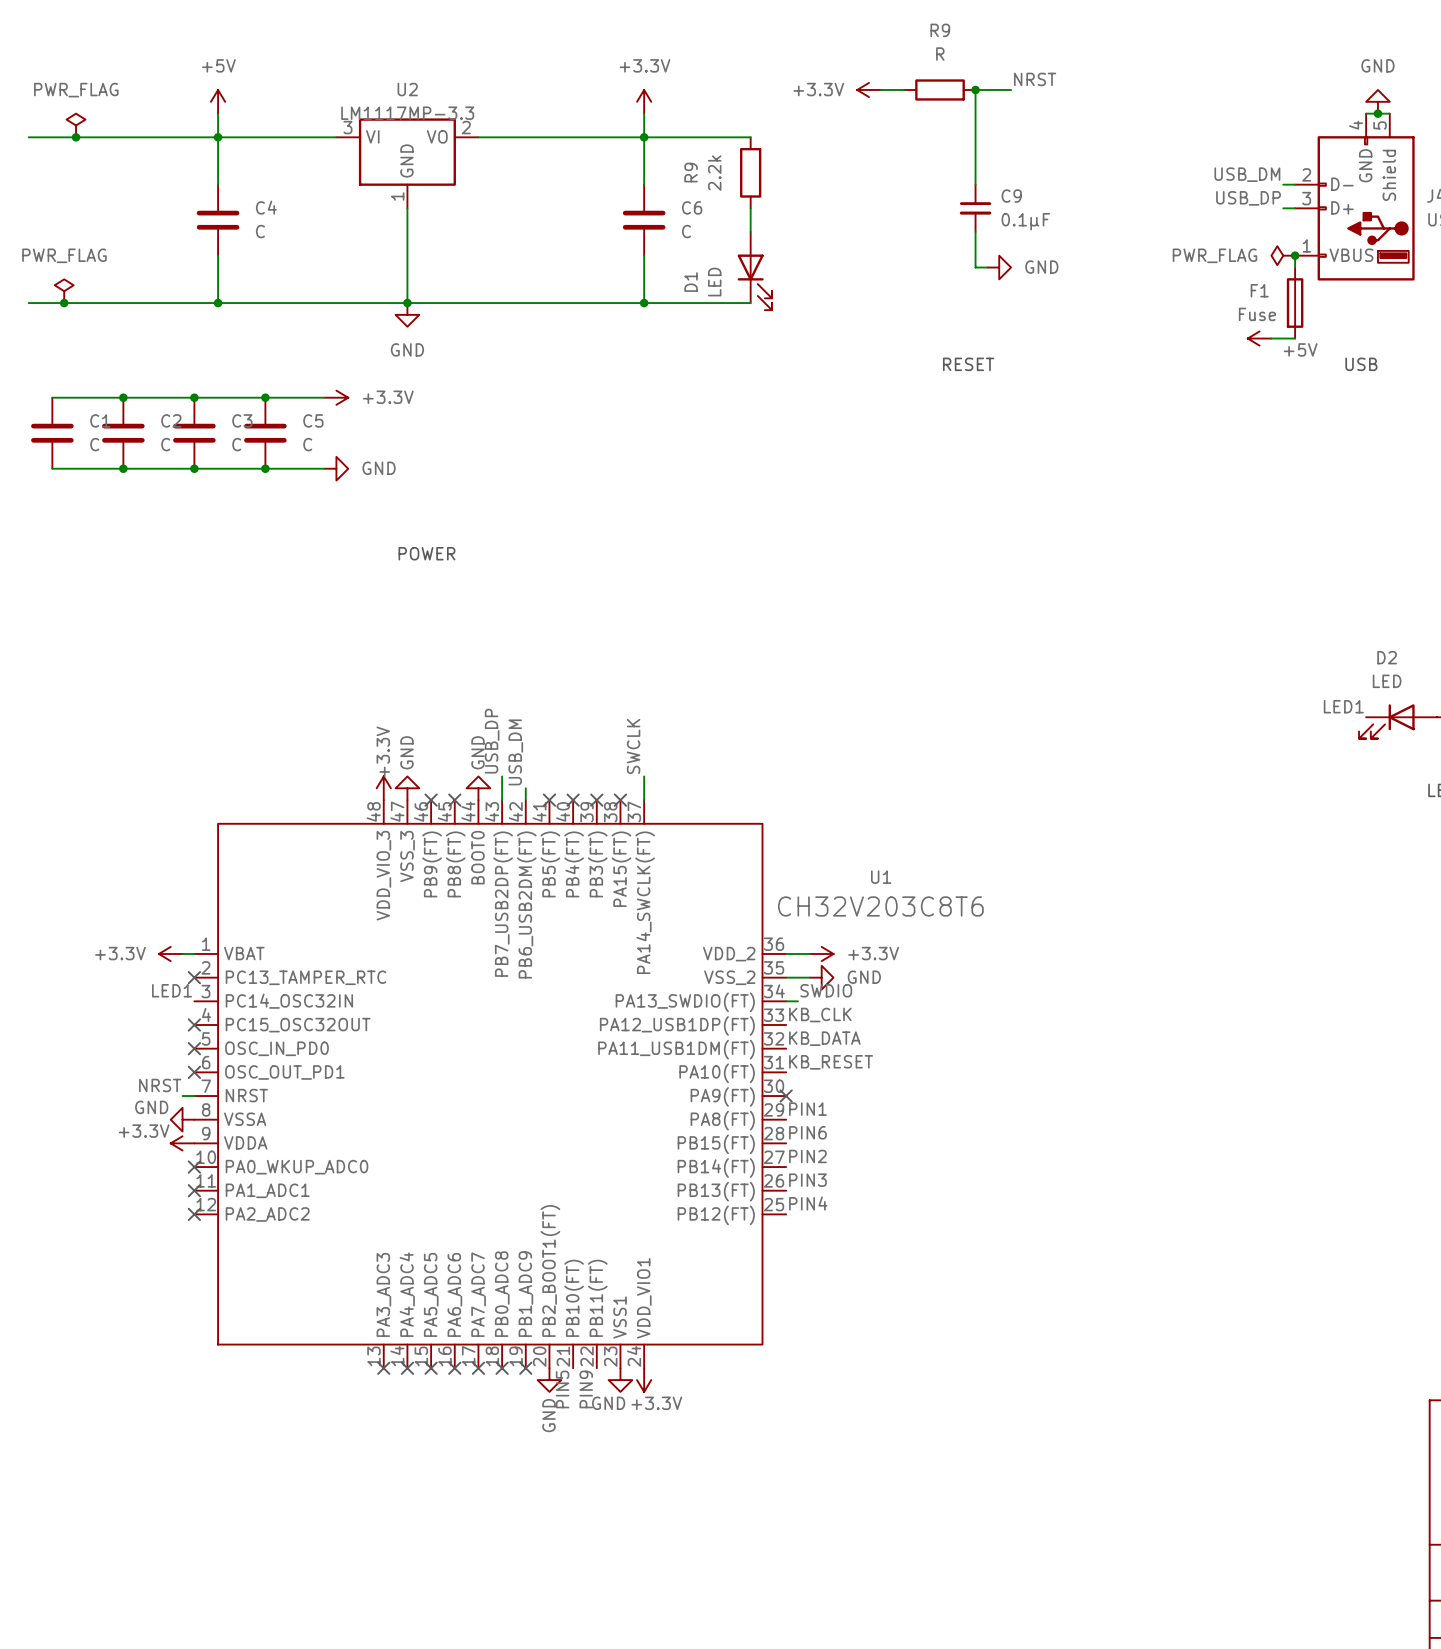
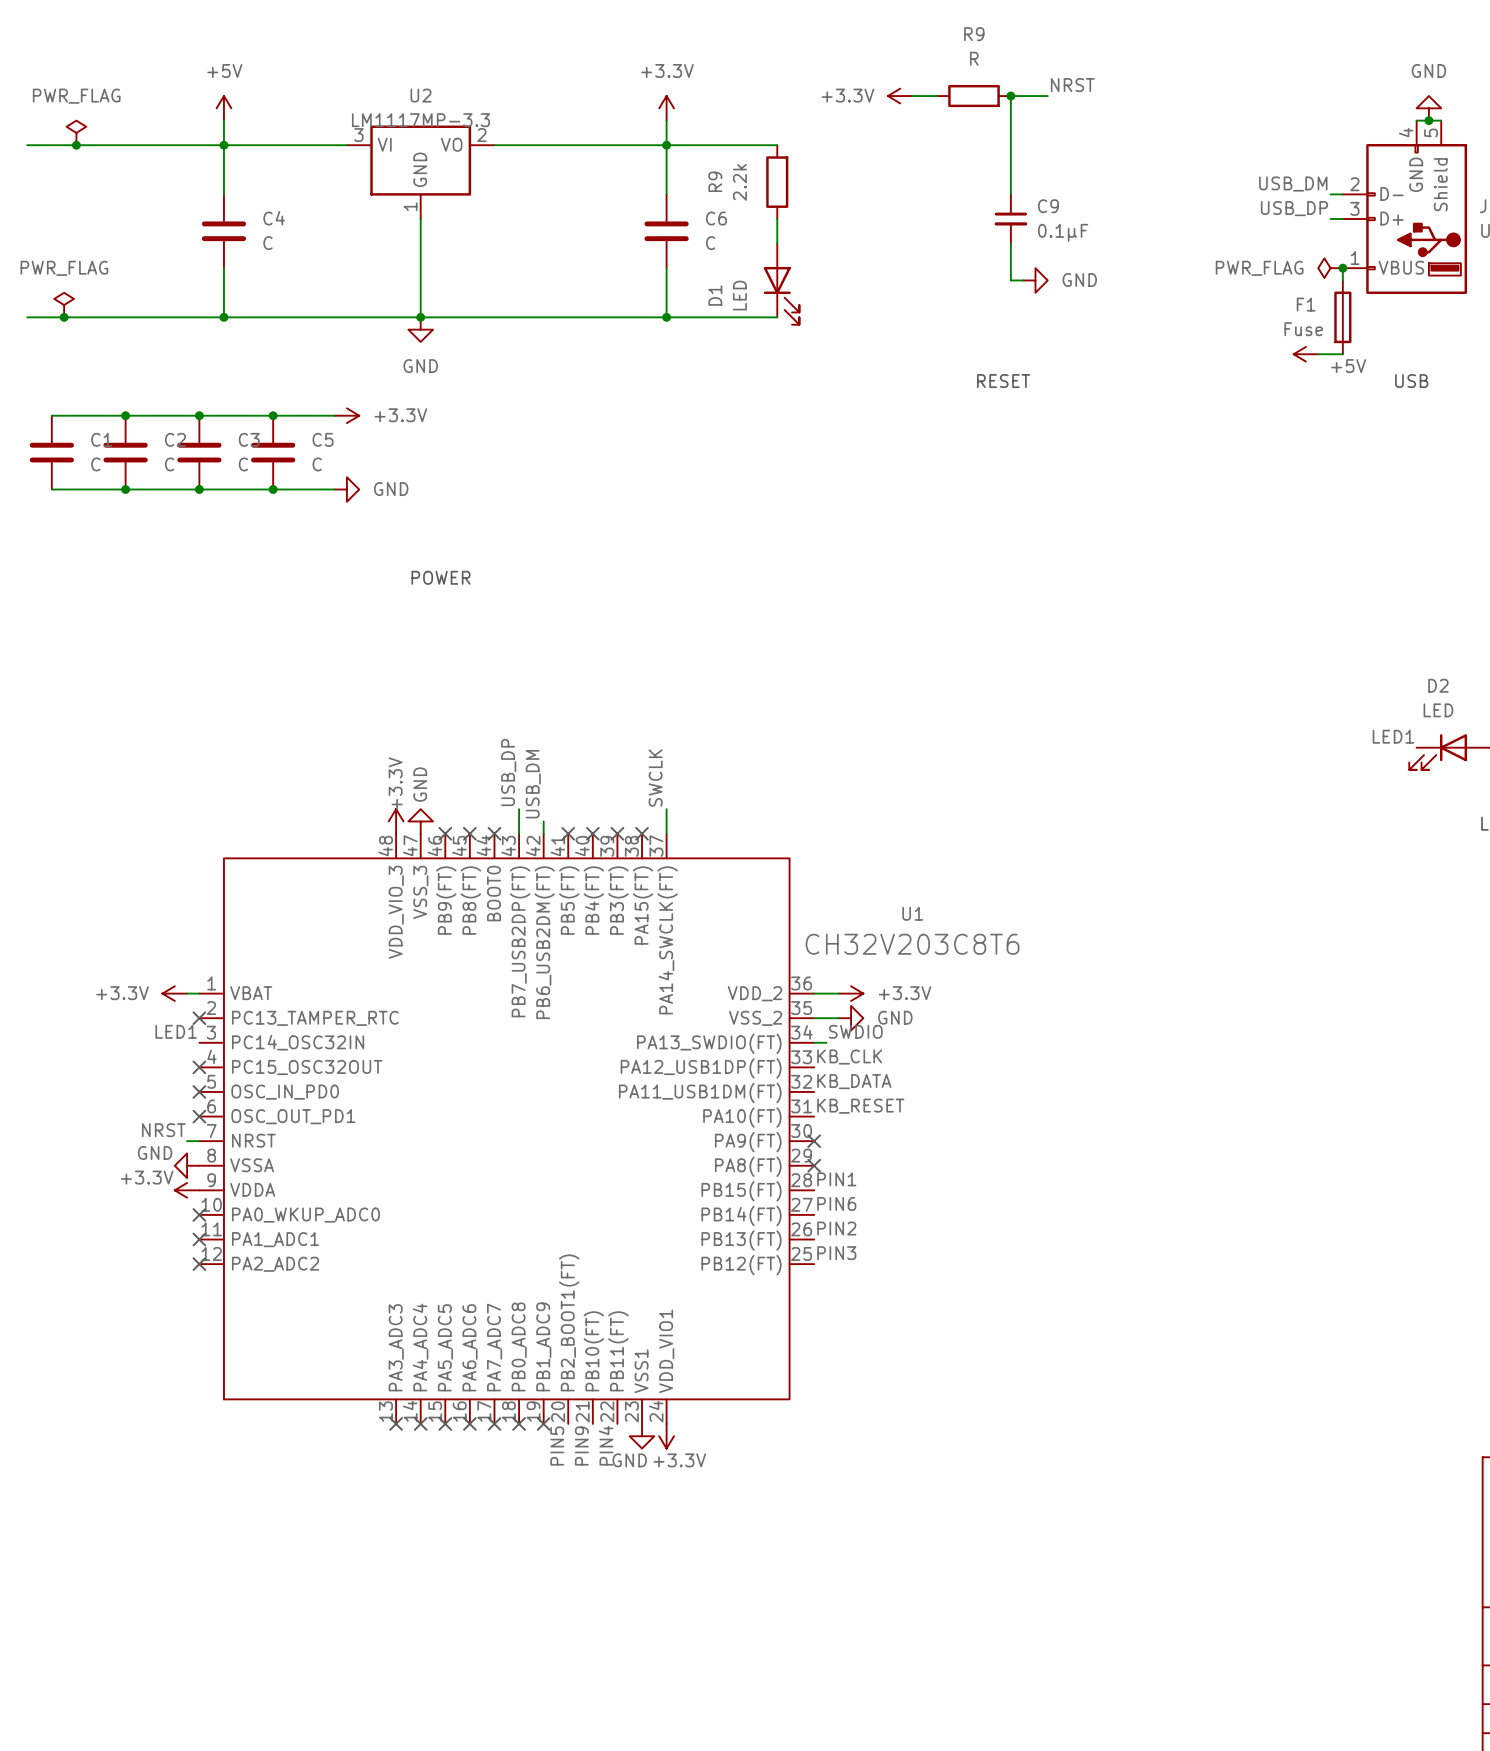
power symbol: GND (478, 788) -> none
no-connect mark: none -> (494, 833)
label: PIN1 (807, 1109) -> none
no-connect mark: none -> (814, 1165)
label: PIN6 (807, 1132) -> PIN1 (836, 1179)
label: PIN2 (807, 1156) -> PIN6 (836, 1203)
label: PIN3 (807, 1180) -> PIN2 (836, 1228)
label: PIN4 (808, 1203) -> PIN3 (836, 1253)
power symbol: GND (549, 1380) -> none
label: none -> PIN5 (557, 1446)
label: PIN5 (562, 1389) -> PIN9 (581, 1446)
label: PIN9 (586, 1389) -> PIN4 (606, 1445)

